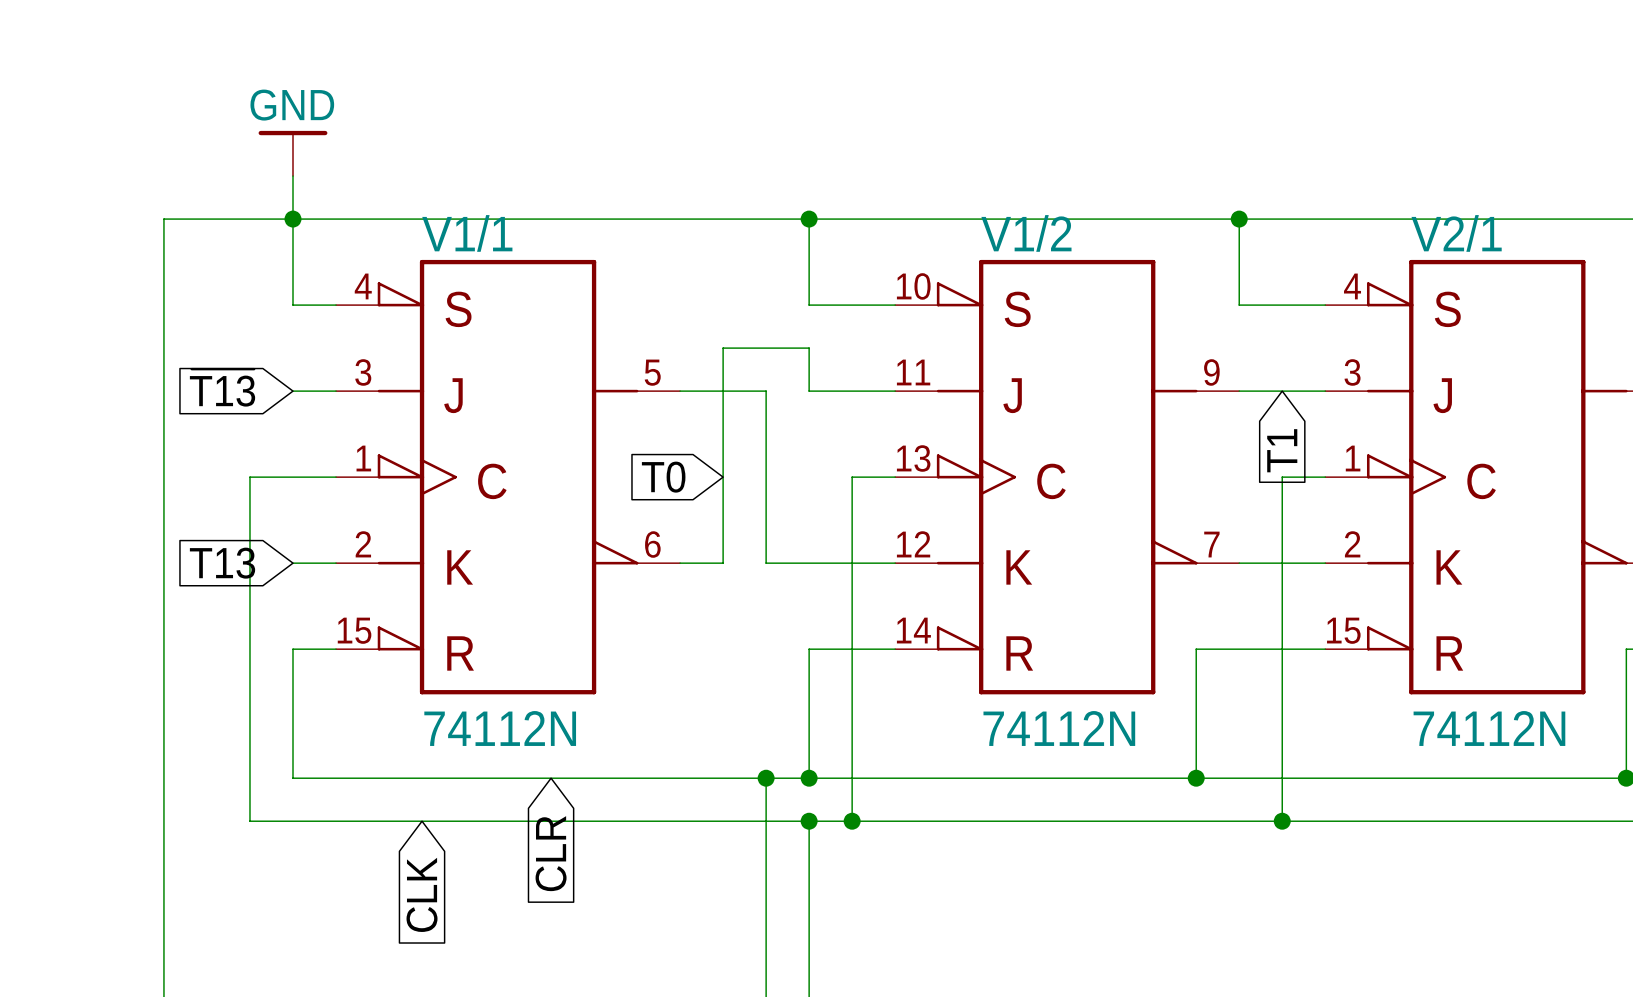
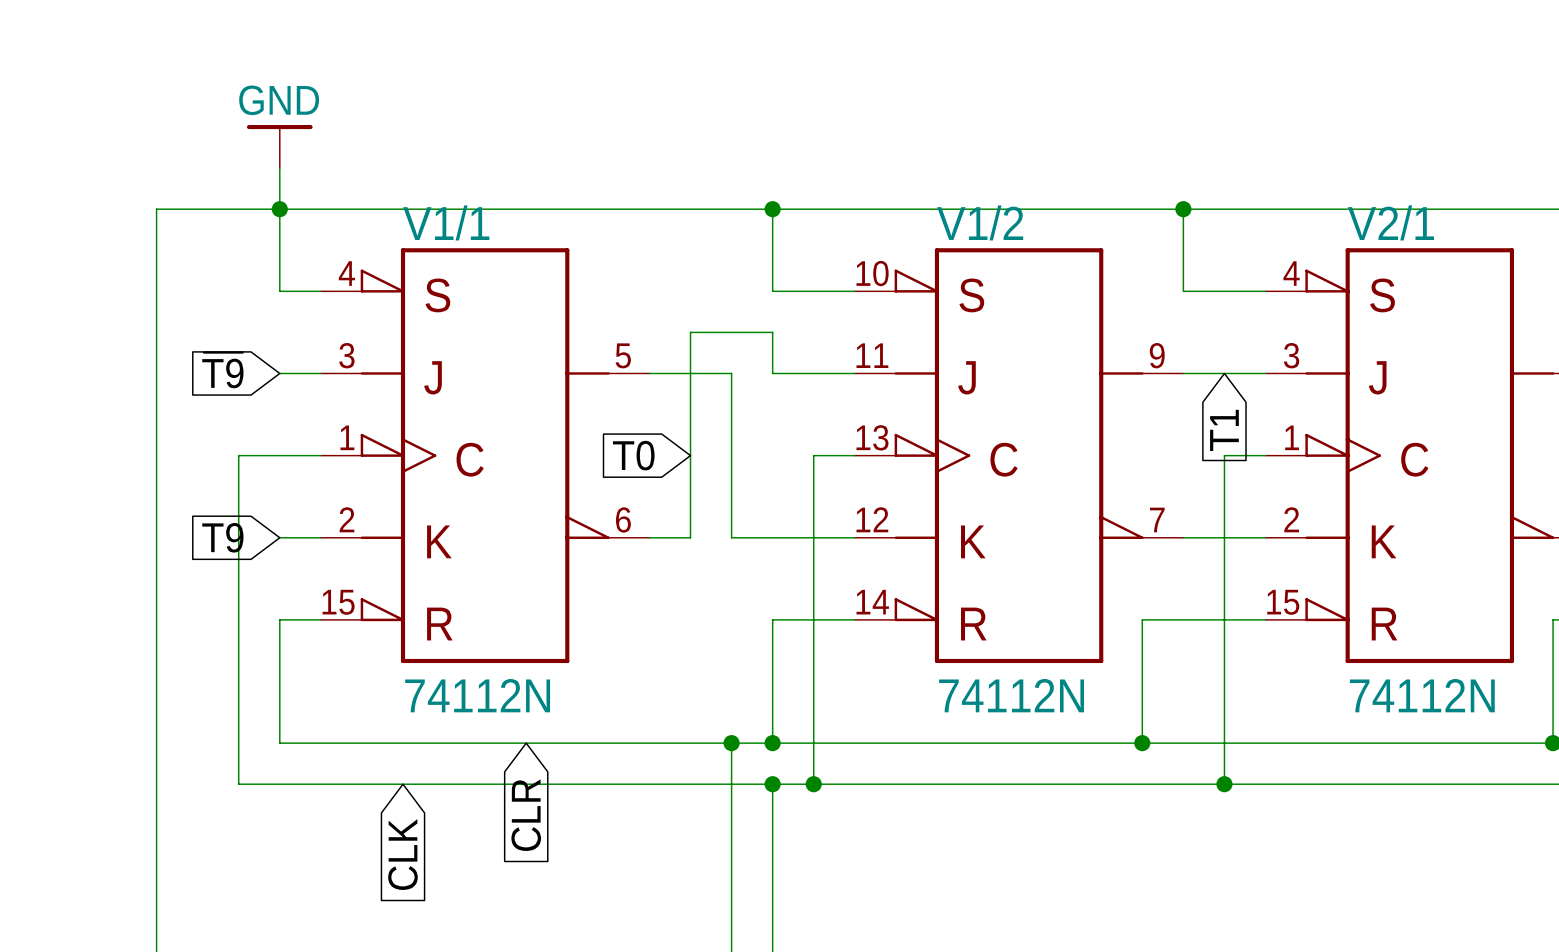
global label: ~{T13} (222, 387) -> ~{T9} (222, 370)
global label: T13 (222, 563) -> T9 (222, 537)

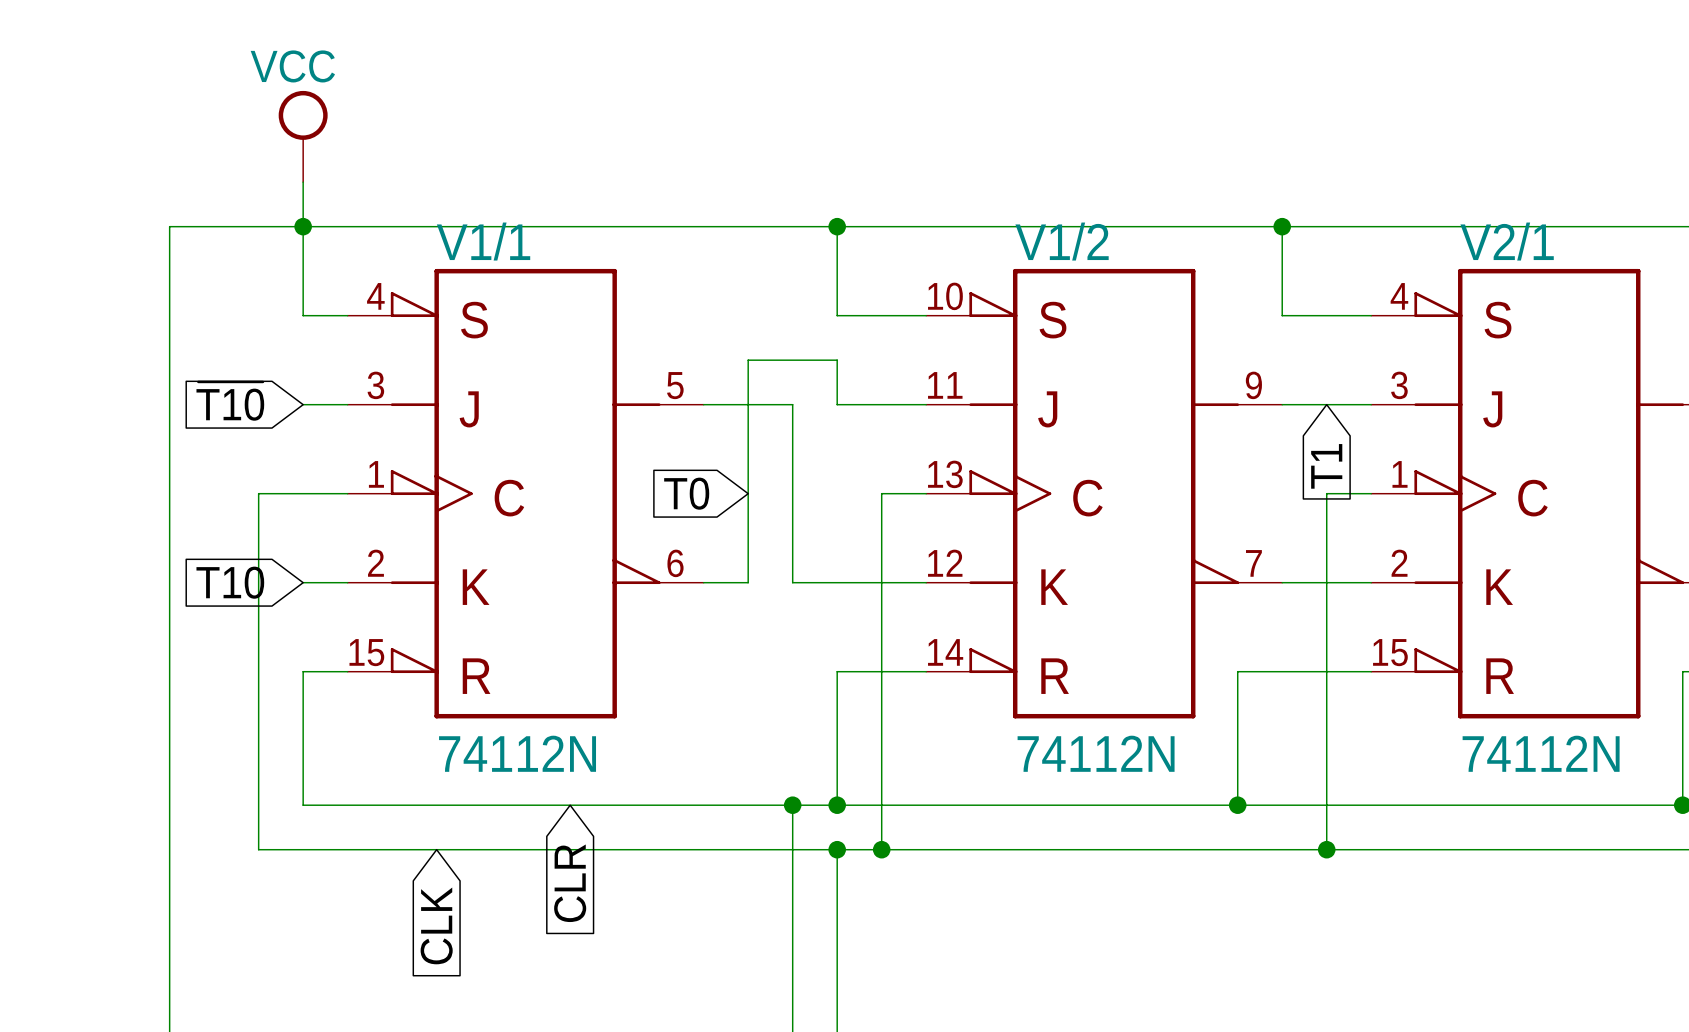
power symbol: none -> VCC (303, 136)
power symbol: GND (279, 146) -> none
global label: ~{T9} (222, 370) -> ~{T10} (230, 401)
global label: T9 (222, 537) -> T10 (230, 582)

